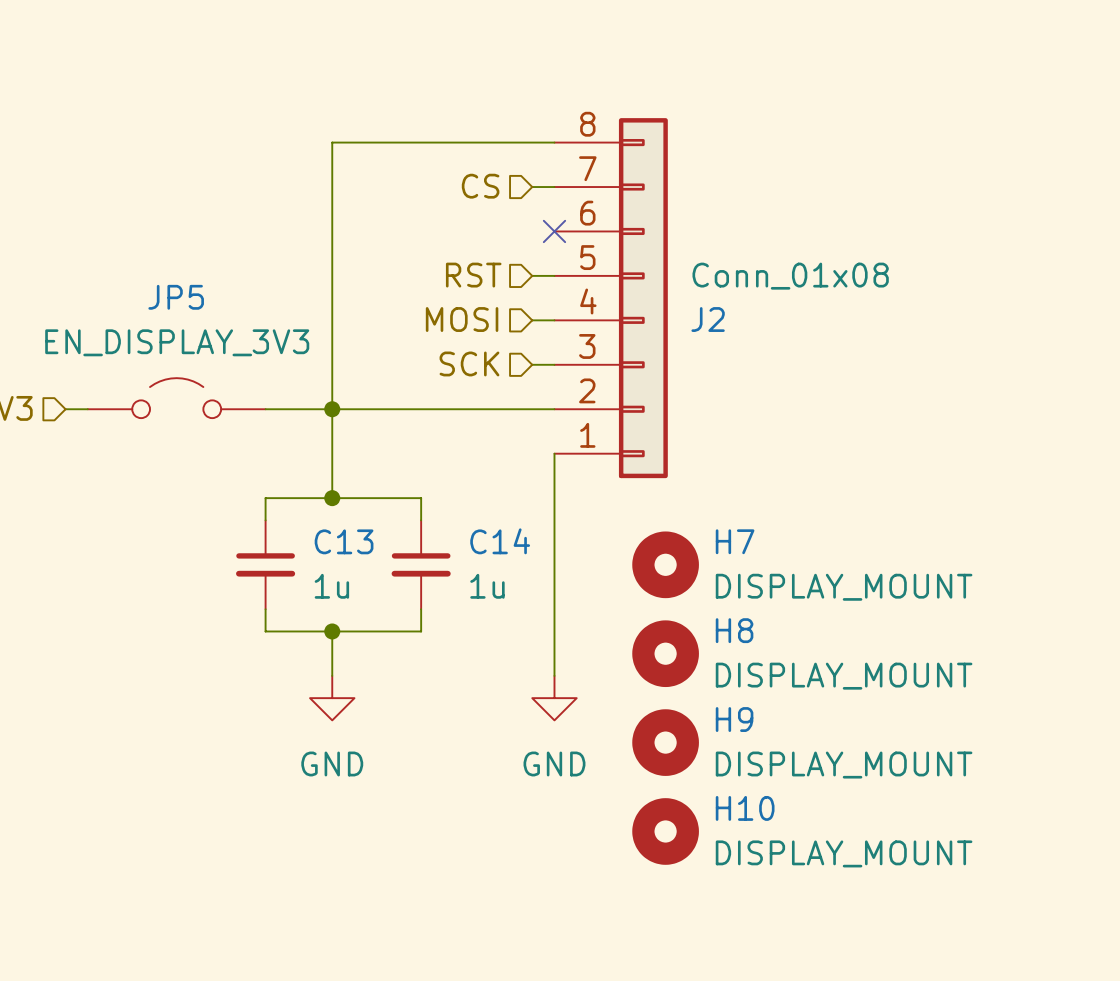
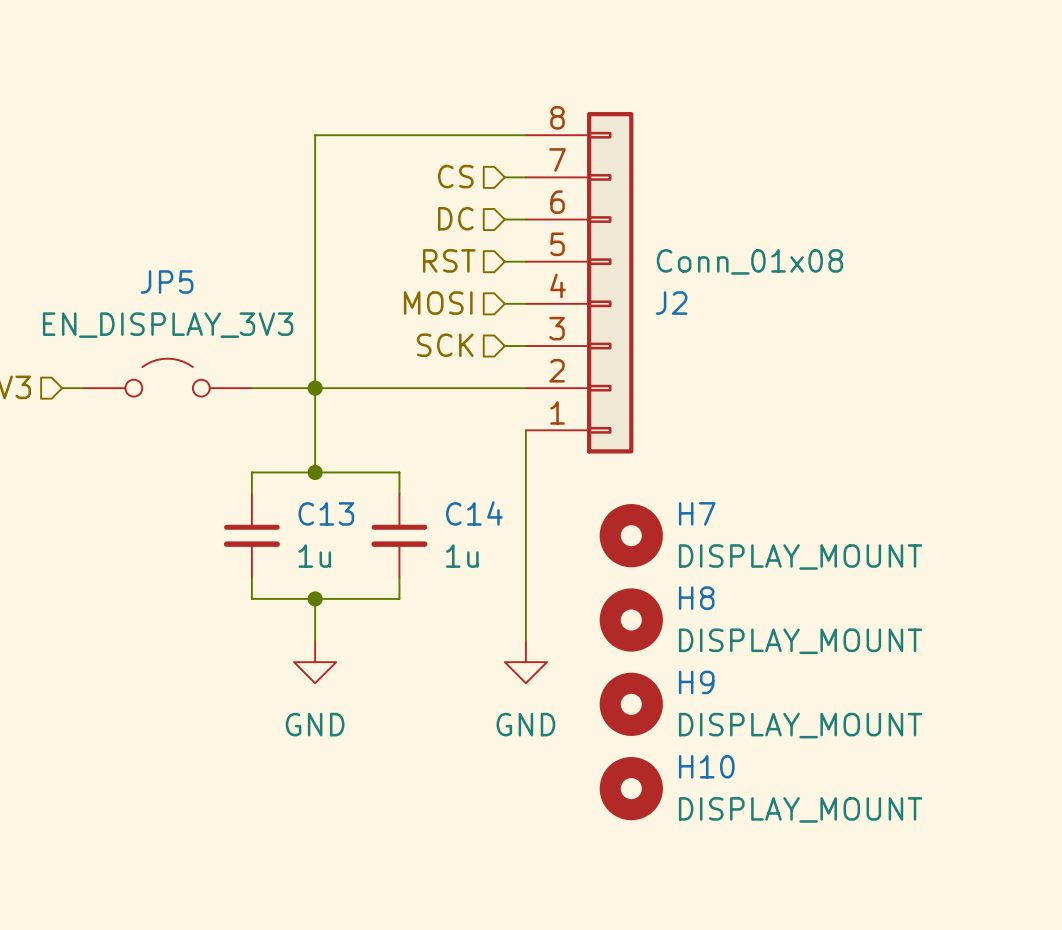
hierarchical label: none -> DC (455, 218)
wire: none -> (504, 219) (525, 219)
no-connect mark: (554, 231) -> none

